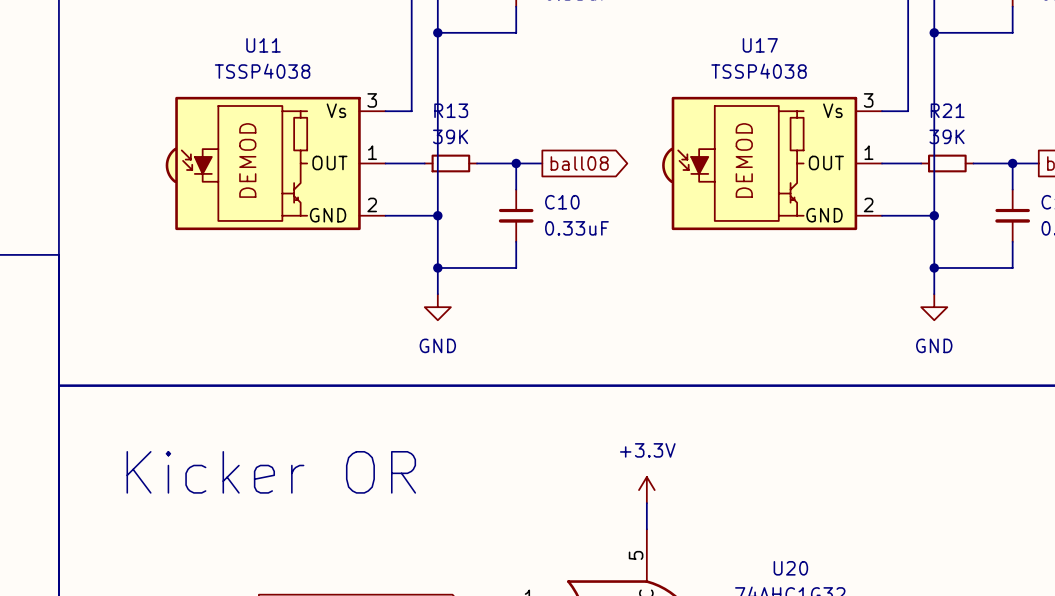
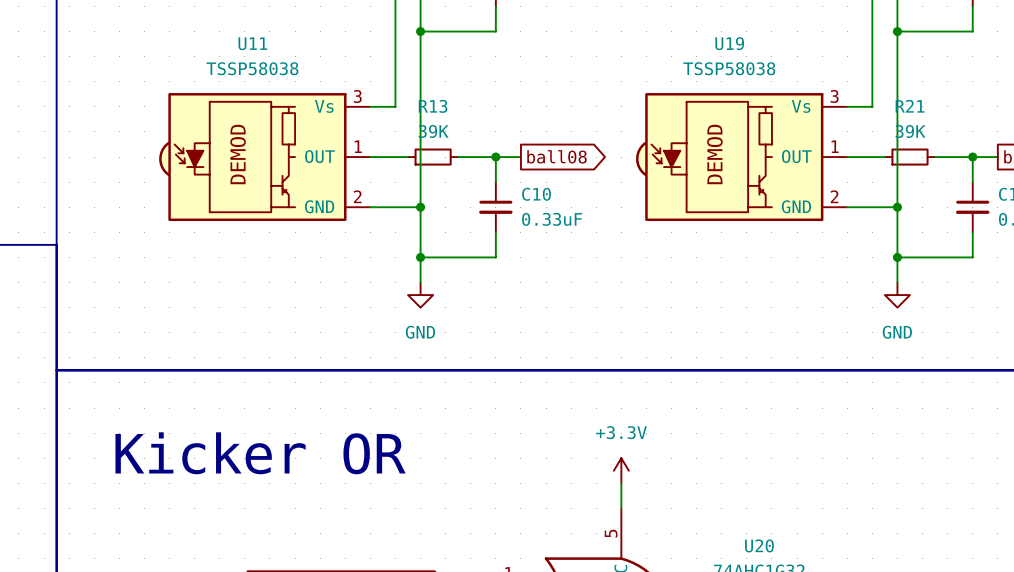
U17 name: U17 (760, 45) -> U19 (729, 43)
U11 value: TSSP4038 (262, 71) -> TSSP58038 (252, 68)
U17 value: TSSP4038 (759, 71) -> TSSP58038 (729, 68)

